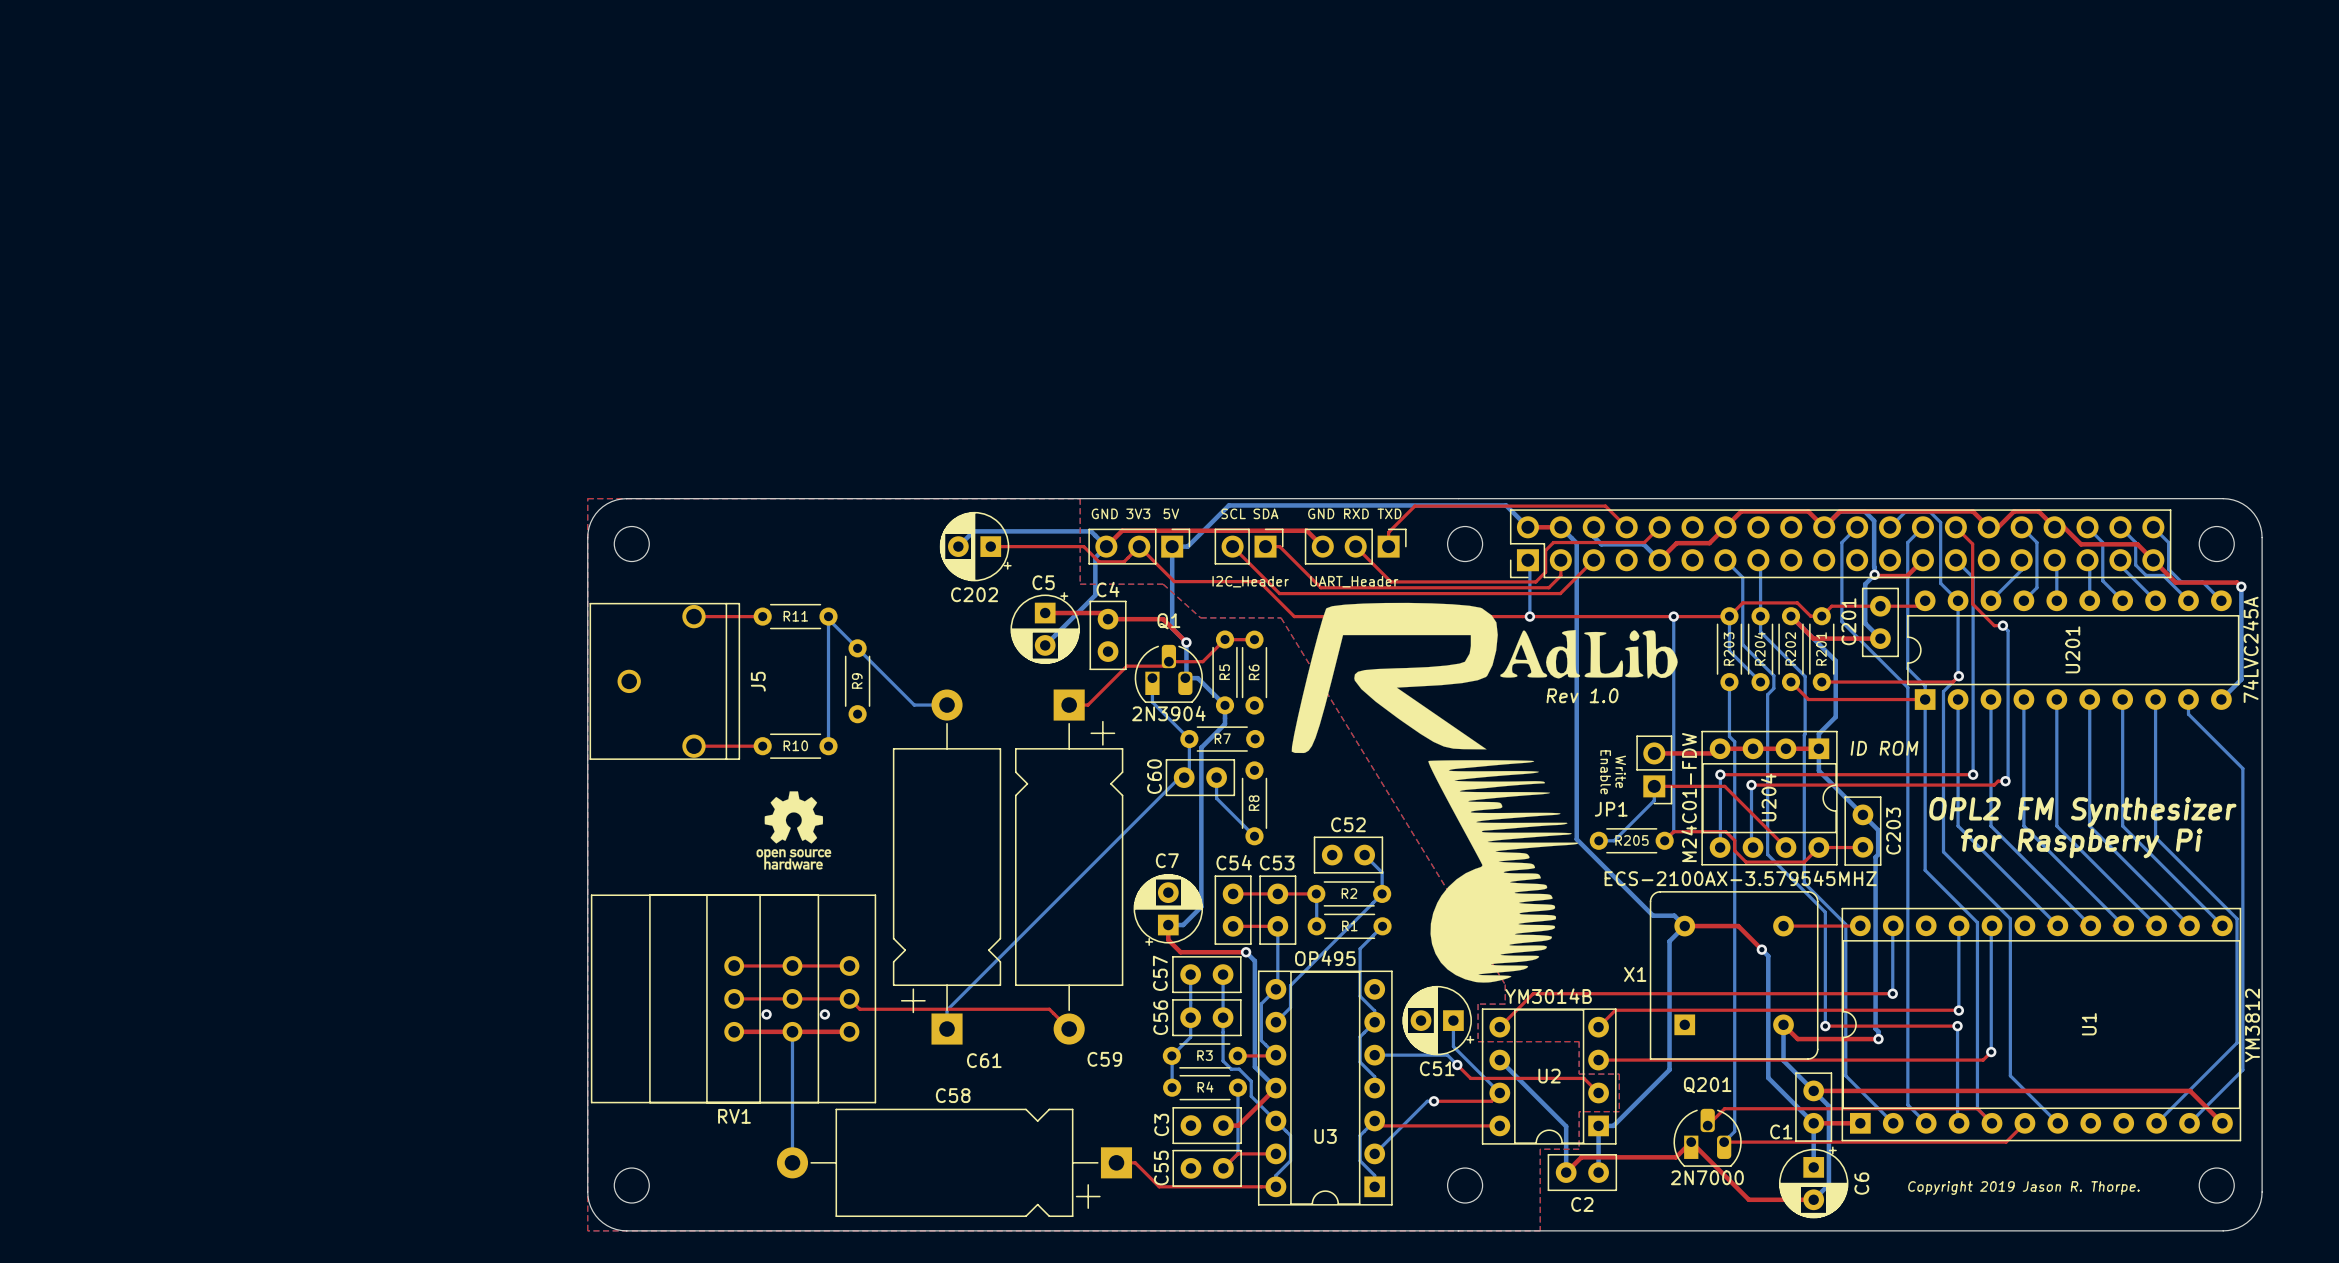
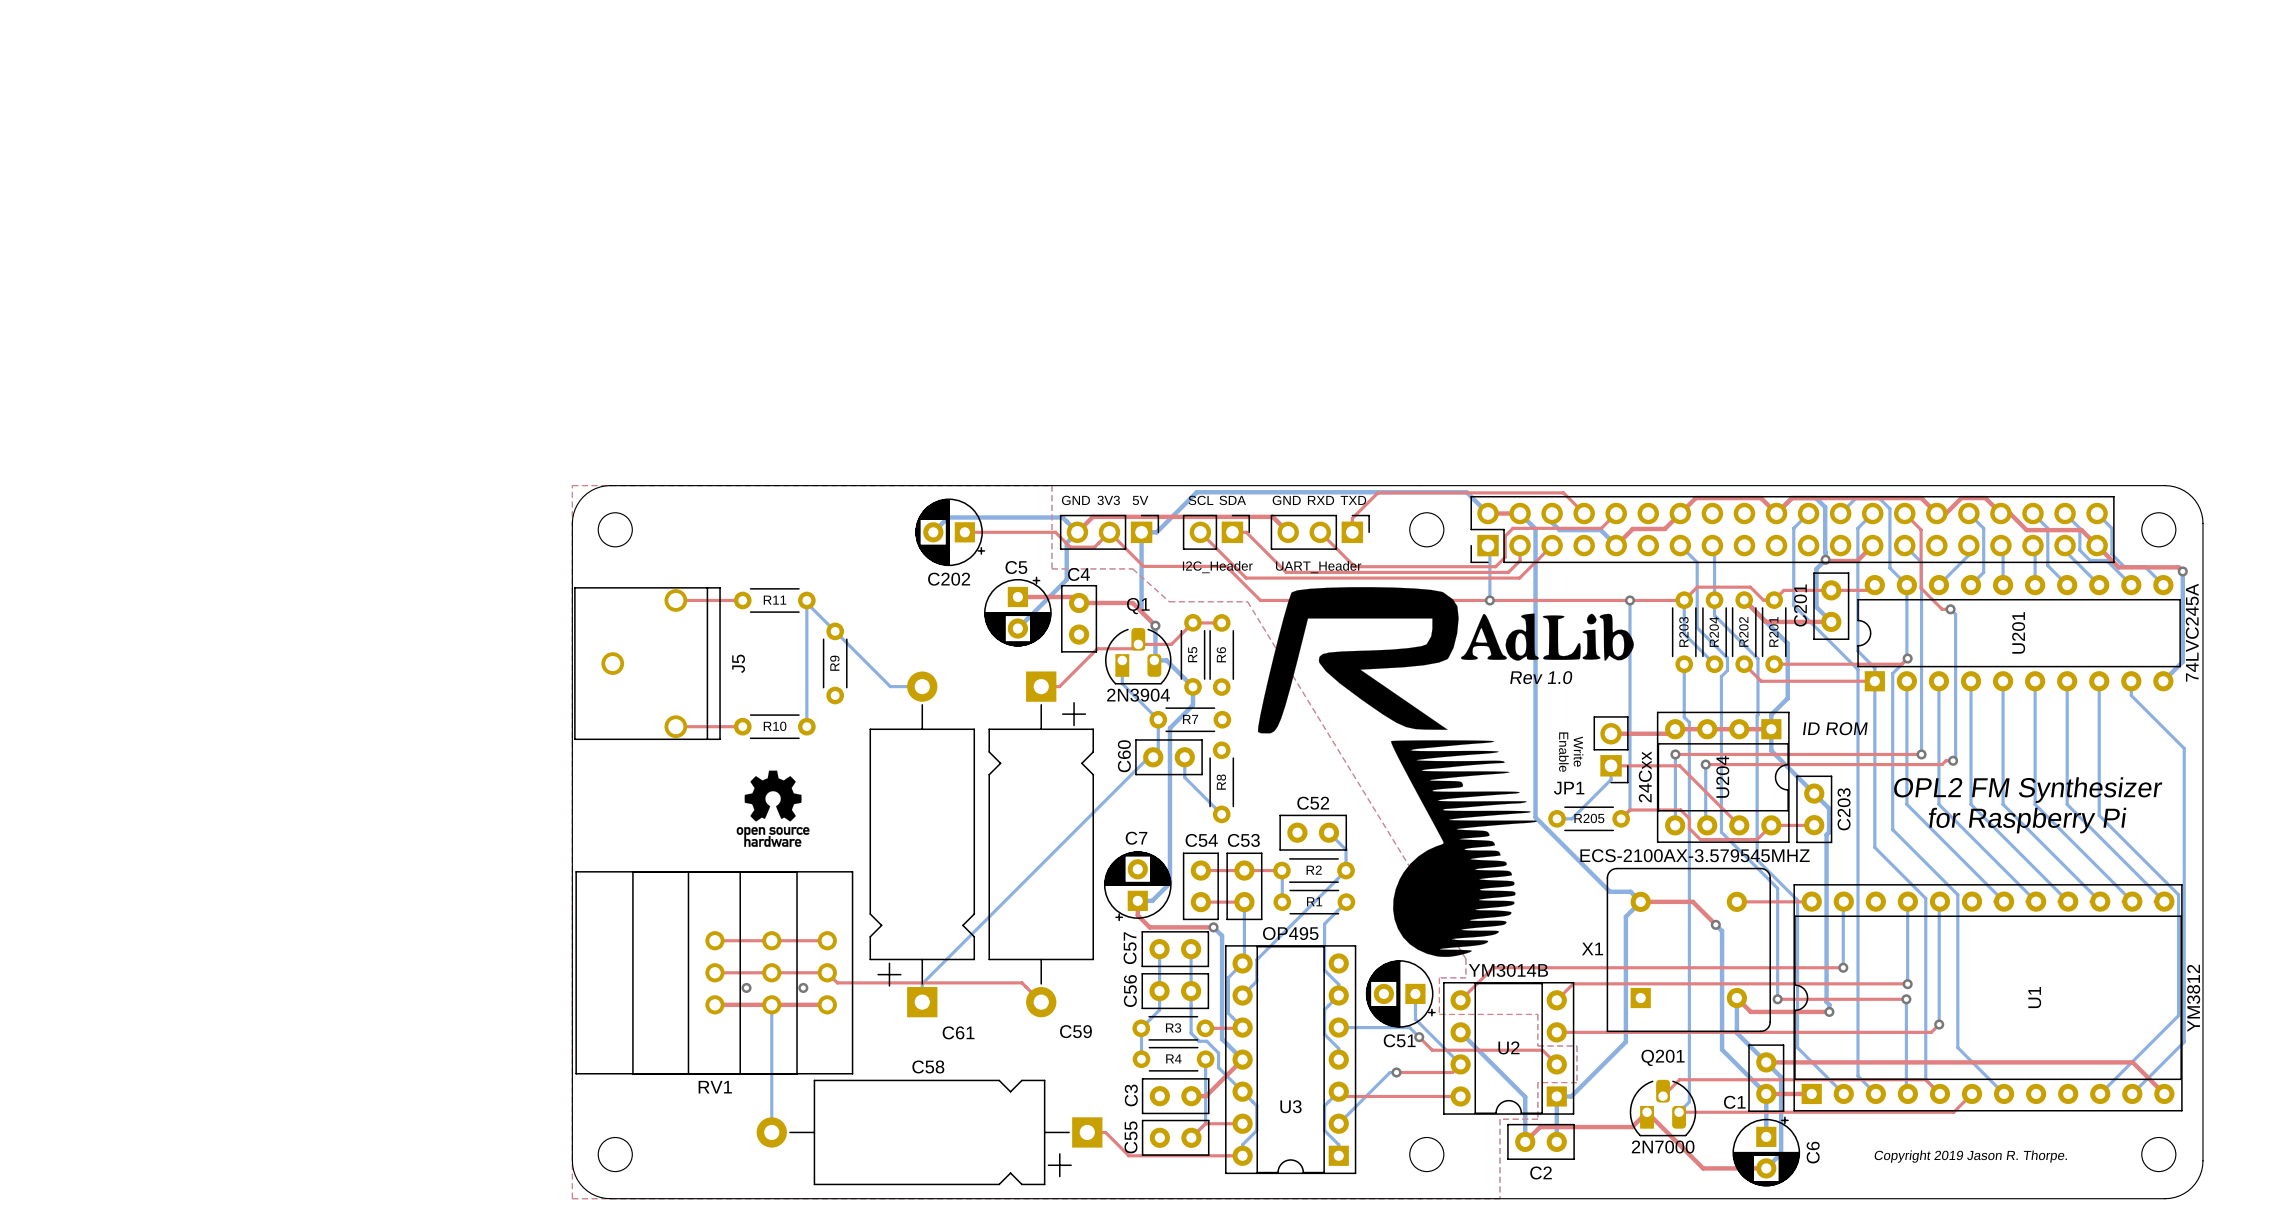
U204 value: M24C01-FDW (1689, 797) -> 24Cxx (1645, 776)

